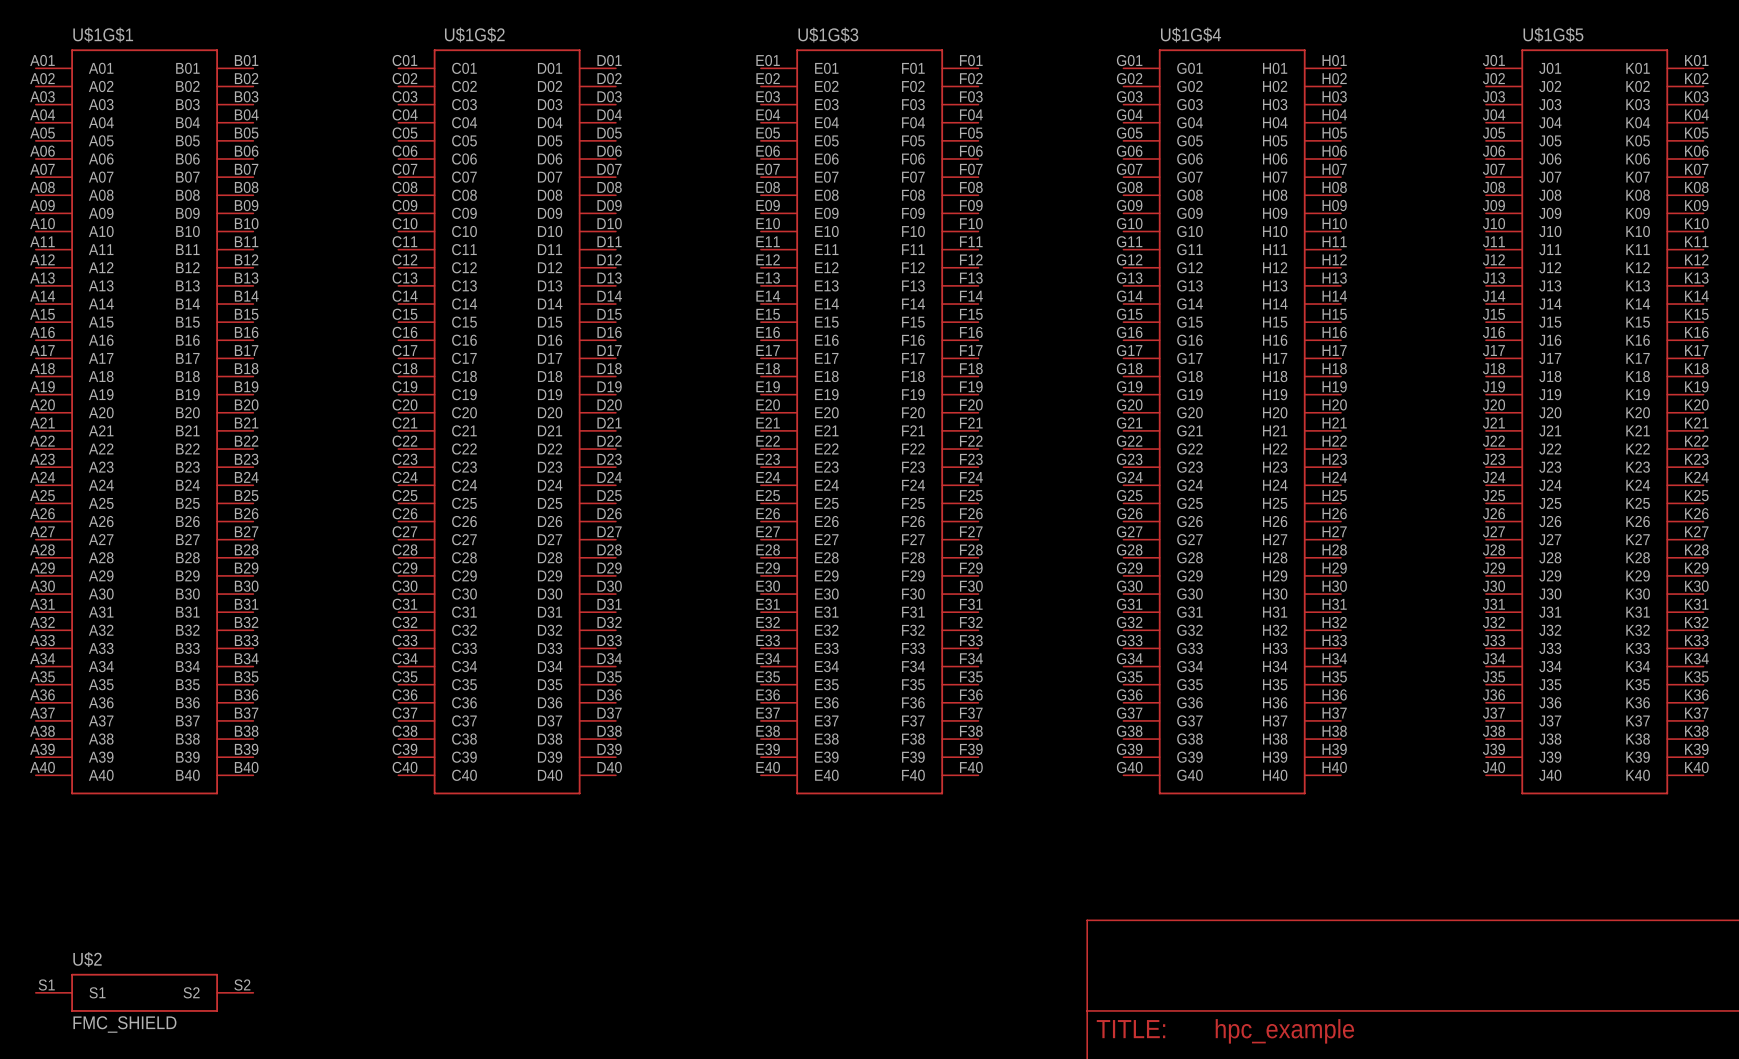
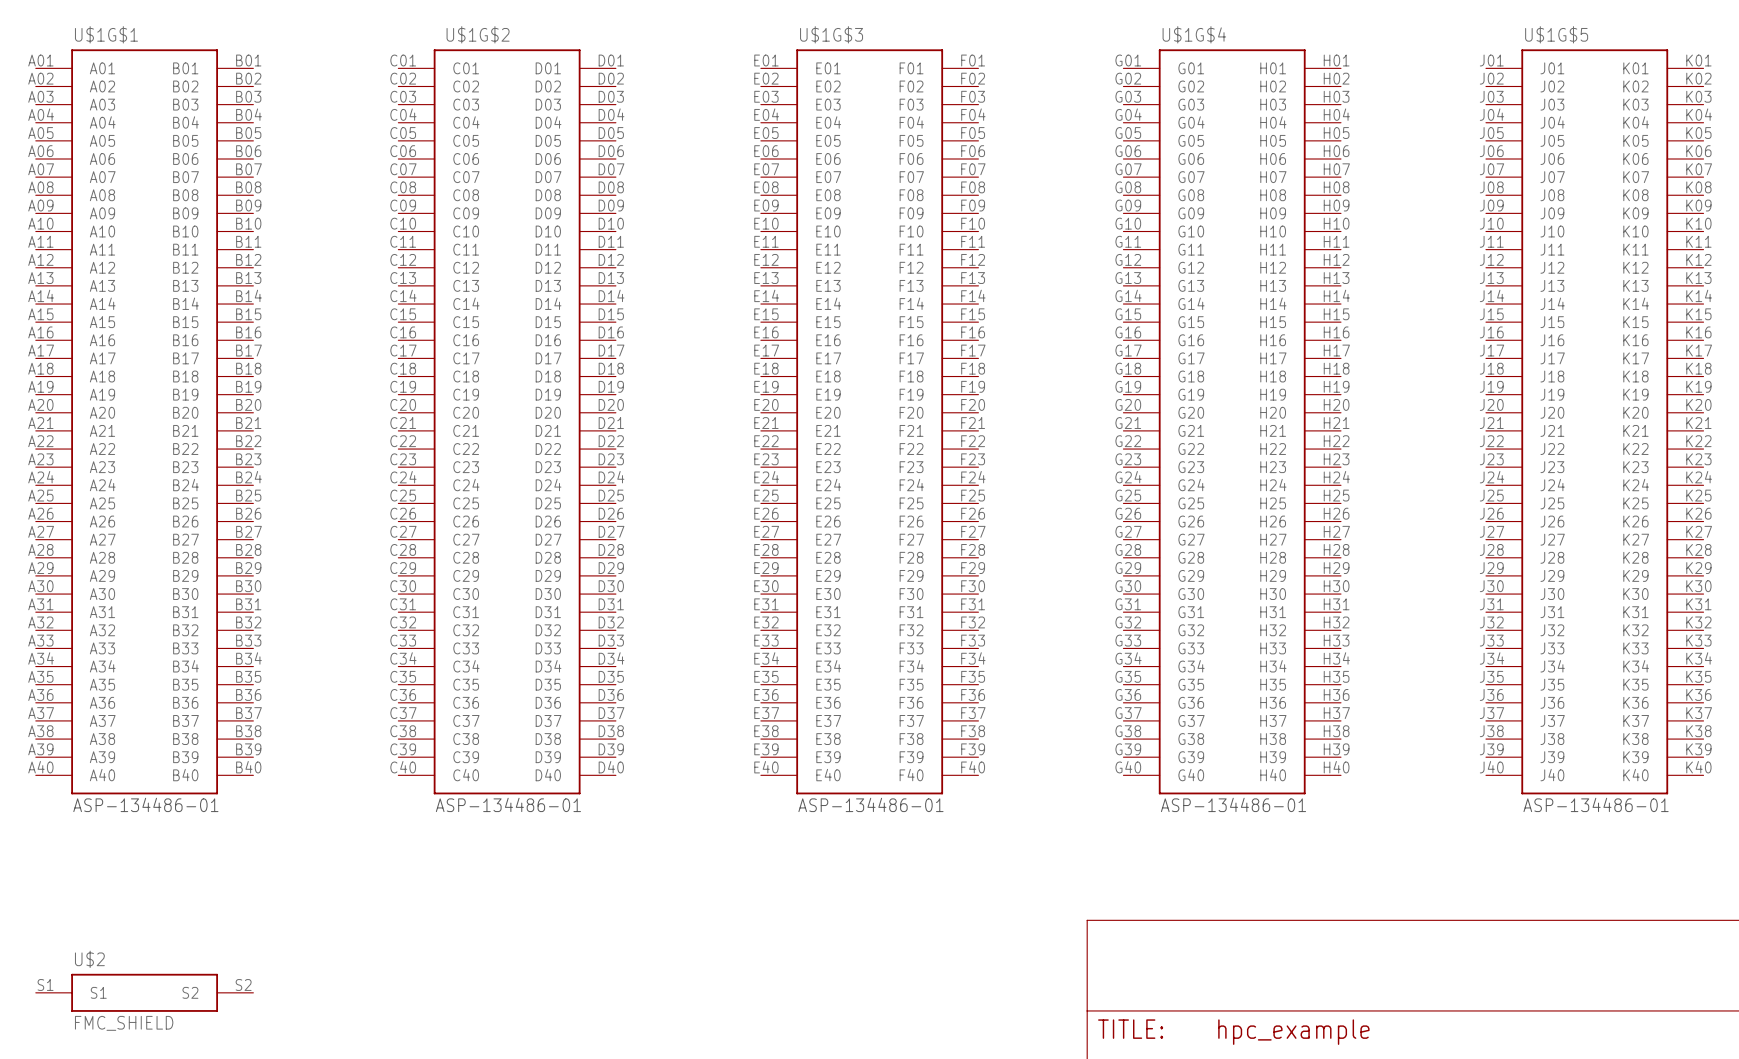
U$1G$1 text: none -> ASP-134486-01 (145, 804)
U$1G$2 text: none -> ASP-134486-01 (508, 804)
U$1G$3 text: none -> ASP-134486-01 (870, 804)
U$1G$4 text: none -> ASP-134486-01 (1233, 804)
U$1G$5 text: none -> ASP-134486-01 (1596, 804)

